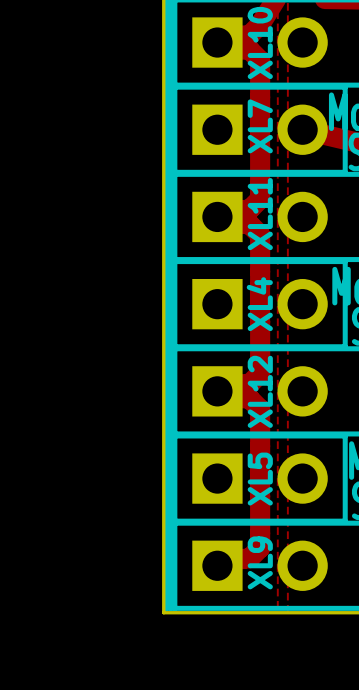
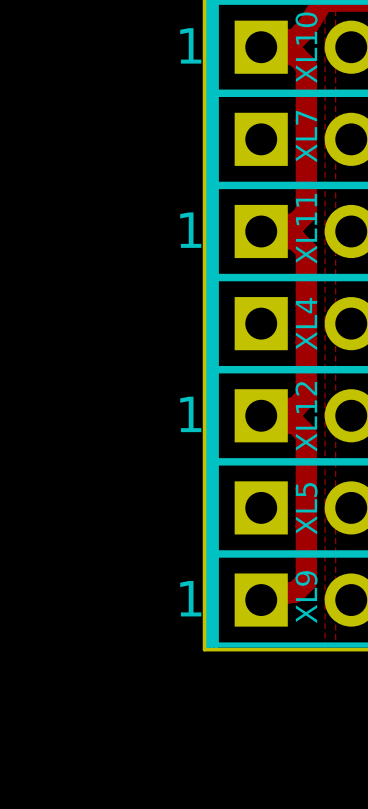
XL10 text: none -> 1 (190, 45)
XL11 text: none -> 1 (190, 230)
XL12 text: none -> 1 (190, 414)
XL9 text: none -> 1 (190, 598)

